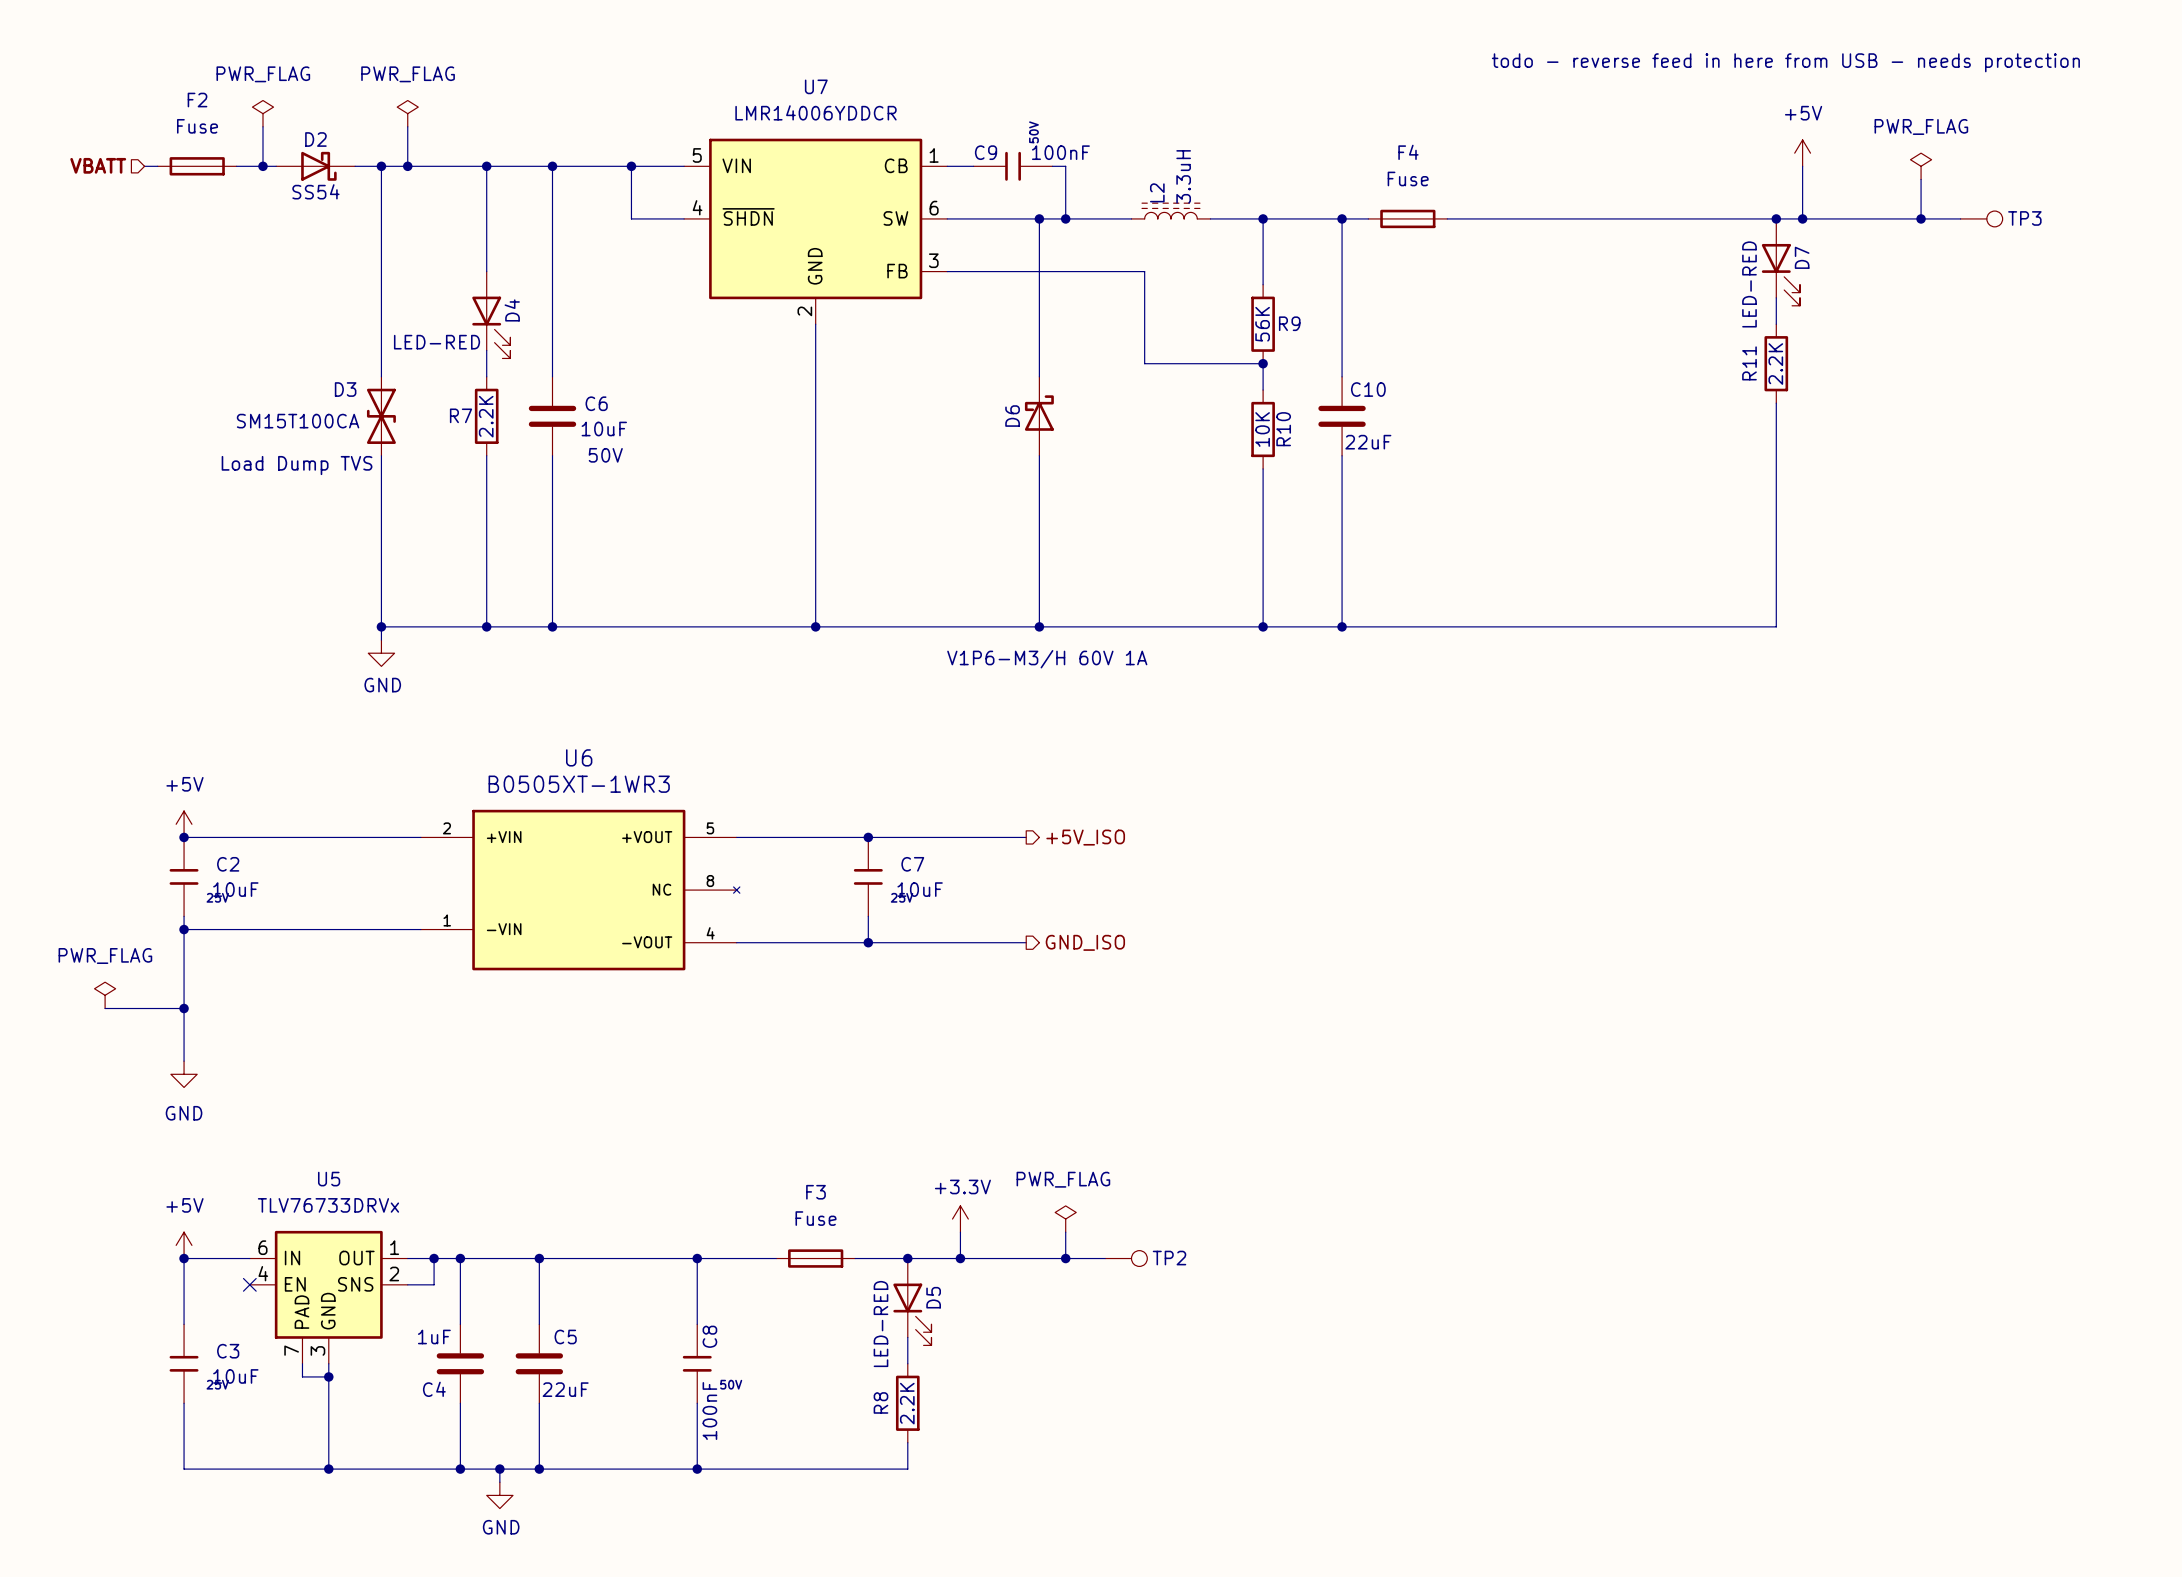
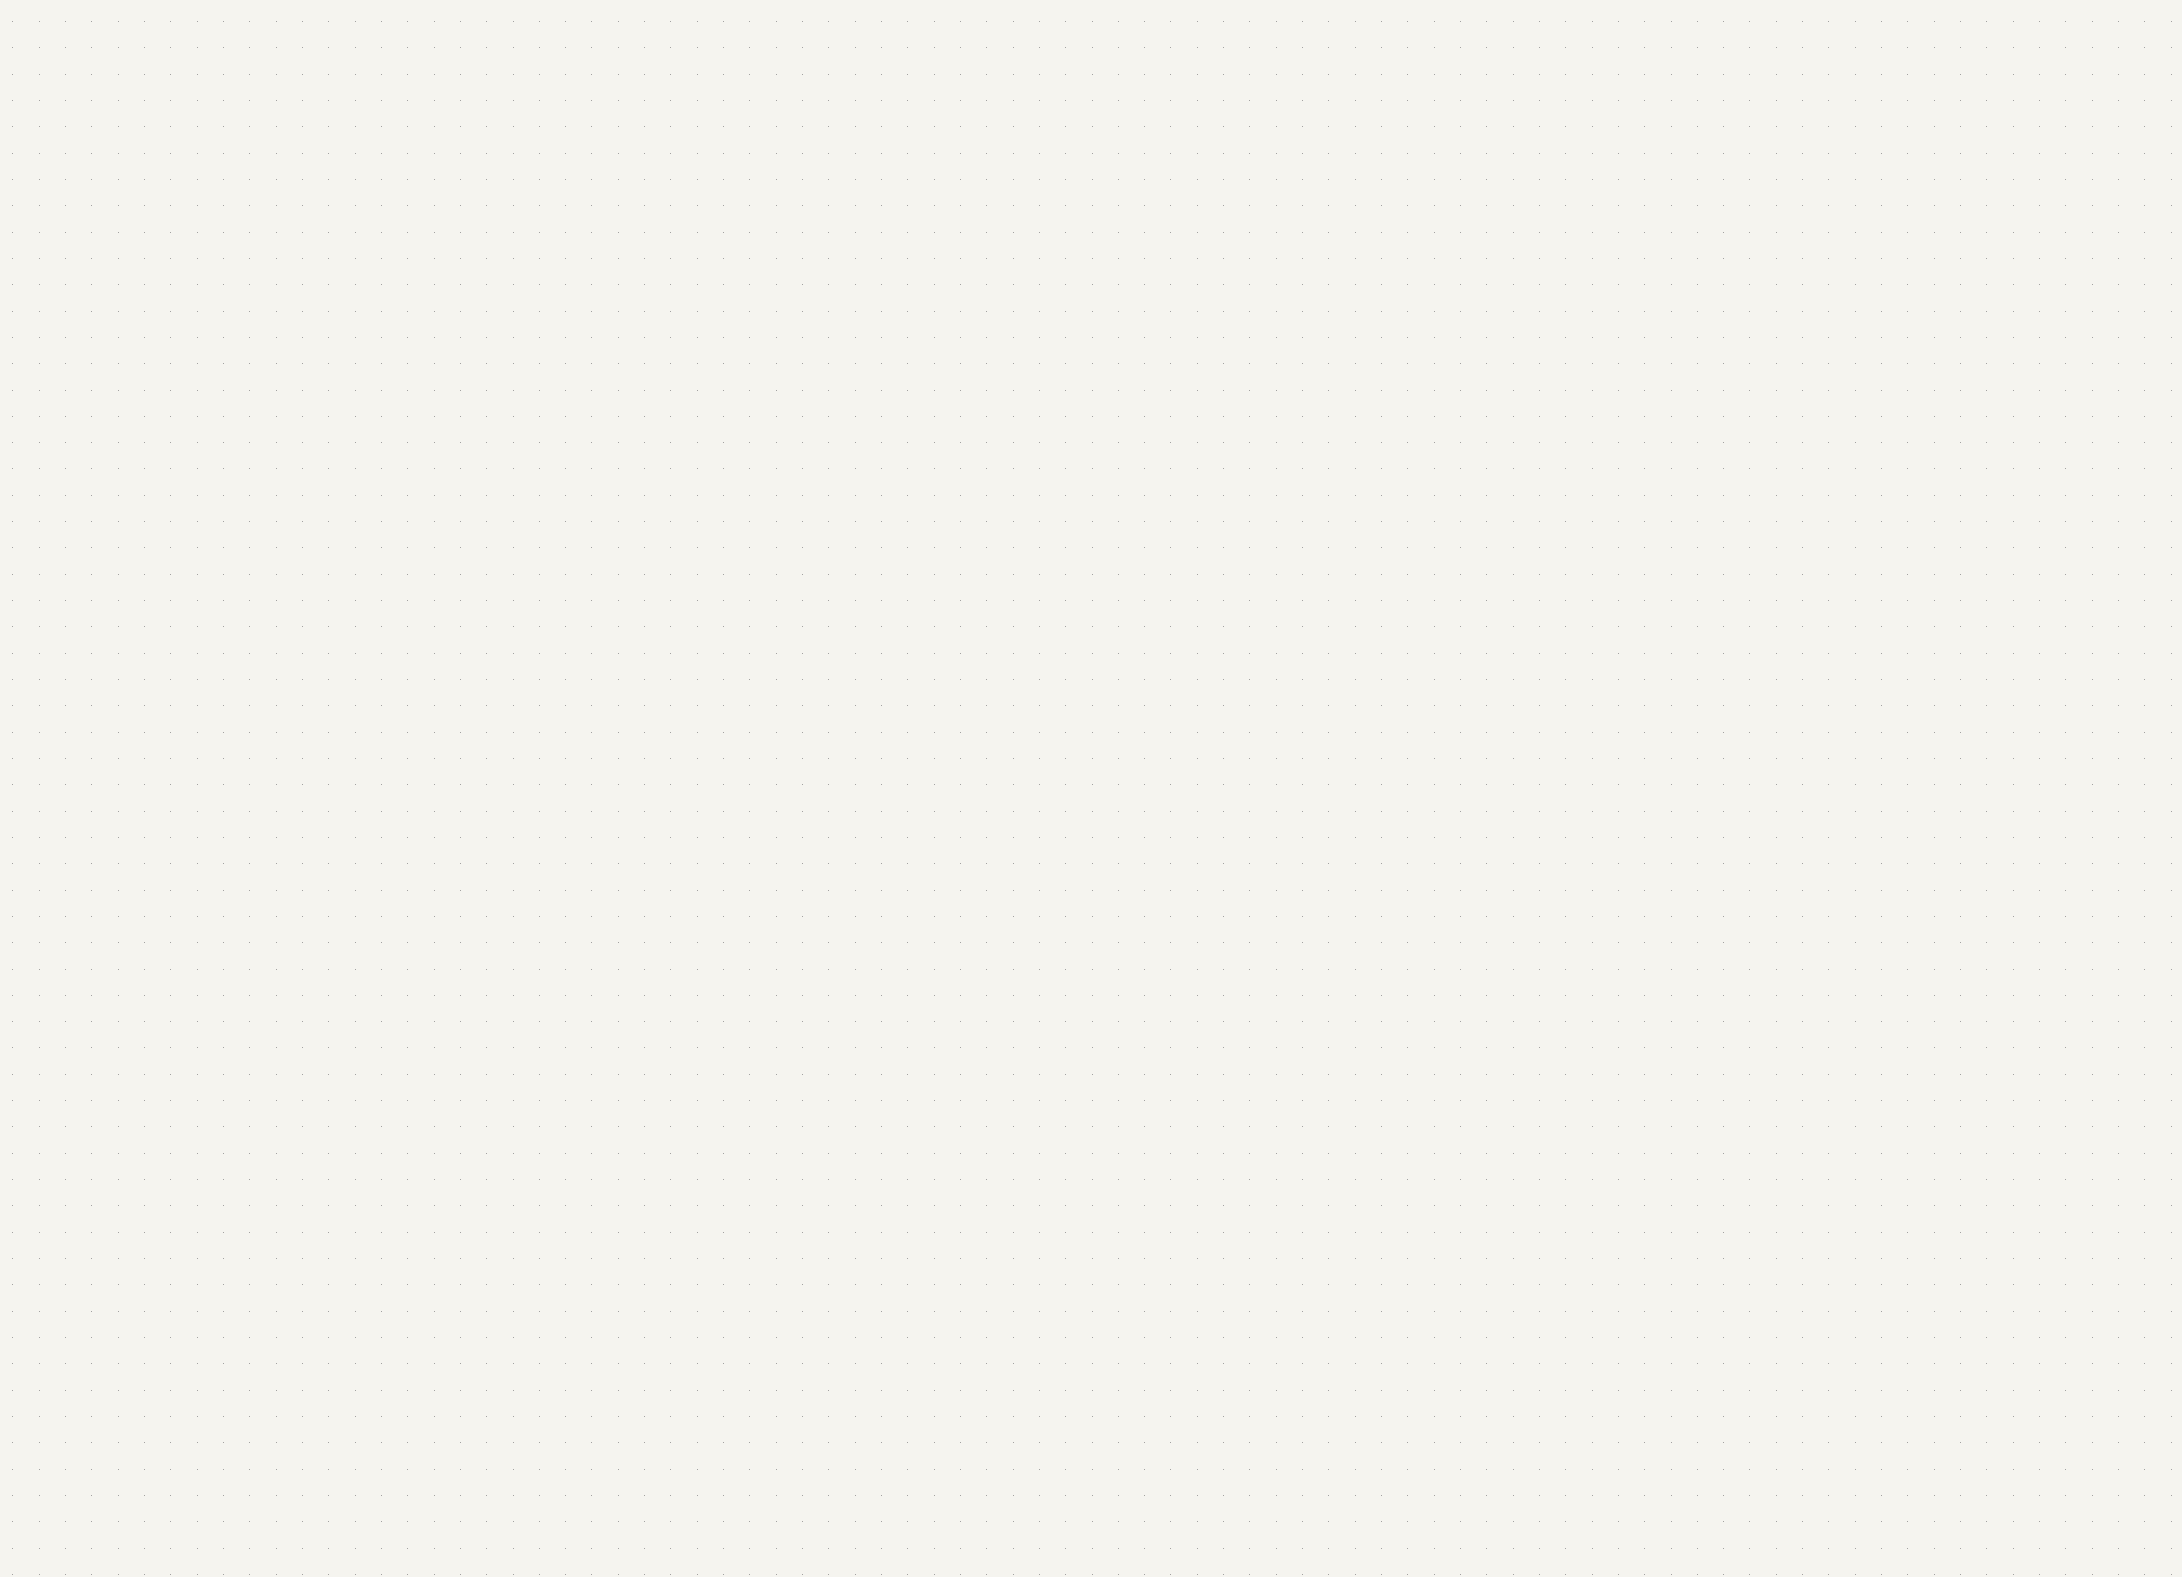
text: todo - reverse feed in here from USB - needs protection (1785, 62) -> none
power symbol: PWR_FLAG (262, 113) -> none
power symbol: PWR_FLAG (407, 113) -> none
wire: (262, 126) (262, 166) -> none
wire: (407, 126) (407, 166) -> none
power symbol: +5V (1802, 153) -> none
hierarchical label: VBATT (98, 165) -> none
wire: (144, 166) (157, 166) -> none
F2: Fuse (197, 166) -> none
wire: (236, 166) (276, 166) -> none
junction: (262, 166) -> none
D2: SS54 (315, 166) -> none
wire: (355, 166) (684, 166) -> none
wire: (381, 166) (381, 376) -> none
junction: (381, 166) -> none
junction: (407, 166) -> none
wire: (486, 166) (486, 271) -> none
junction: (486, 166) -> none
wire: (552, 166) (552, 376) -> none
junction: (552, 166) -> none
wire: (631, 166) (631, 218) (684, 218) -> none
junction: (631, 166) -> none
wire: (947, 166) (973, 166) -> none
C9: 100nF (1013, 166) -> none
wire: (1052, 166) (1065, 166) (1065, 218) -> none
wire: (1802, 166) (1802, 218) -> none
power symbol: PWR_FLAG (1921, 166) -> none
wire: (1921, 179) (1921, 218) -> none
L2: 3.3uH (1170, 211) -> none
wire: (947, 218) (1131, 218) -> none
wire: (1039, 218) (1039, 376) -> none
junction: (1039, 218) -> none
junction: (1065, 218) -> none
wire: (1210, 218) (1368, 218) -> none
wire: (1263, 218) (1263, 284) -> none
junction: (1263, 218) -> none
wire: (1342, 218) (1342, 376) -> none
junction: (1342, 218) -> none
F4: Fuse (1407, 218) -> none
wire: (1447, 218) (1960, 218) -> none
junction: (1776, 218) -> none
junction: (1802, 218) -> none
junction: (1921, 218) -> none
TP3: (1981, 218) -> none
U7: LMR14006YDDCR (815, 231) -> none
D7: LED-RED (1780, 262) -> none
wire: (947, 271) (1144, 271) (1144, 363) (1263, 363) (1263, 390) -> none
wire: (1776, 297) (1776, 324) -> none
D4: LED-RED (491, 315) -> none
wire: (815, 324) (815, 626) -> none
R9: 56K (1263, 324) -> none
wire: (486, 350) (486, 376) -> none
junction: (1263, 363) -> none
R11: 2.2K (1776, 363) -> none
wire: (1776, 403) (1776, 626) (381, 626) -> none
D3: SM15T100CA (381, 416) -> none
R7: 2.2K (486, 416) -> none
C6: 10uF (552, 416) -> none
D6: V1P6-M3/H 60V 1A (1039, 416) -> none
C10: 22uF (1342, 416) -> none
R10: 10K (1263, 429) -> none
wire: (381, 455) (381, 640) -> none
wire: (486, 455) (486, 626) -> none
wire: (552, 455) (552, 626) -> none
wire: (1039, 455) (1039, 626) -> none
wire: (1342, 455) (1342, 626) -> none
text: Load Dump TVS (297, 465) -> none
wire: (1263, 468) (1263, 626) -> none
junction: (381, 626) -> none
junction: (486, 626) -> none
junction: (552, 626) -> none
junction: (815, 626) -> none
junction: (1039, 626) -> none
junction: (1263, 626) -> none
junction: (1342, 626) -> none
power symbol: GND (381, 653) -> none
power symbol: +5V (184, 824) -> none
wire: (184, 837) (420, 837) -> none
junction: (184, 837) -> none
wire: (736, 837) (1026, 837) -> none
junction: (868, 837) -> none
hierarchical label: +5V_ISO (1085, 837) -> none
C2: 10uF (184, 876) -> none
C7: 10uF (868, 876) -> none
U6: B0505XT-1WR3 (580, 890) -> none
wire: (184, 916) (184, 1061) -> none
wire: (868, 916) (868, 942) -> none
wire: (184, 929) (420, 929) -> none
junction: (184, 929) -> none
wire: (736, 942) (1026, 942) -> none
junction: (868, 942) -> none
hierarchical label: GND_ISO (1085, 942) -> none
power symbol: PWR_FLAG (105, 995) -> none
wire: (105, 1008) (184, 1008) -> none
junction: (184, 1008) -> none
power symbol: GND (184, 1074) -> none
power symbol: +3.3V (960, 1219) -> none
power symbol: PWR_FLAG (1065, 1219) -> none
wire: (960, 1232) (960, 1258) -> none
wire: (1065, 1232) (1065, 1258) -> none
power symbol: +5V (184, 1245) -> none
junction: (184, 1258) -> none
wire: (249, 1258) (184, 1258) (184, 1324) -> none
wire: (407, 1258) (776, 1258) -> none
wire: (434, 1258) (434, 1284) (407, 1284) -> none
junction: (434, 1258) -> none
wire: (460, 1258) (460, 1324) -> none
junction: (460, 1258) -> none
wire: (539, 1258) (539, 1324) -> none
junction: (539, 1258) -> none
wire: (697, 1258) (697, 1324) -> none
junction: (697, 1258) -> none
F3: Fuse (815, 1258) -> none
wire: (855, 1258) (1105, 1258) -> none
junction: (907, 1258) -> none
junction: (960, 1258) -> none
junction: (1065, 1258) -> none
TP2: (1126, 1258) -> none
no-connect mark: (249, 1284) -> none
U5: TLV76733DRVx (328, 1297) -> none
D5: LED-RED (912, 1301) -> none
wire: (907, 1337) (907, 1363) -> none
C3: 10uF (184, 1363) -> none
wire: (302, 1363) (302, 1376) (328, 1376) -> none
wire: (328, 1363) (328, 1469) -> none
C4: 1uF (460, 1363) -> none
C5: 22uF (539, 1363) -> none
C8: 100nF (697, 1363) -> none
junction: (328, 1376) -> none
wire: (184, 1403) (184, 1469) (907, 1469) (907, 1442) -> none
wire: (460, 1403) (460, 1469) -> none
wire: (539, 1403) (539, 1469) -> none
wire: (697, 1403) (697, 1469) -> none
R8: 2.2K (907, 1403) -> none
junction: (328, 1469) -> none
junction: (460, 1469) -> none
wire: (499, 1469) (499, 1482) -> none
junction: (499, 1469) -> none
junction: (539, 1469) -> none
junction: (697, 1469) -> none
power symbol: GND (499, 1495) -> none

